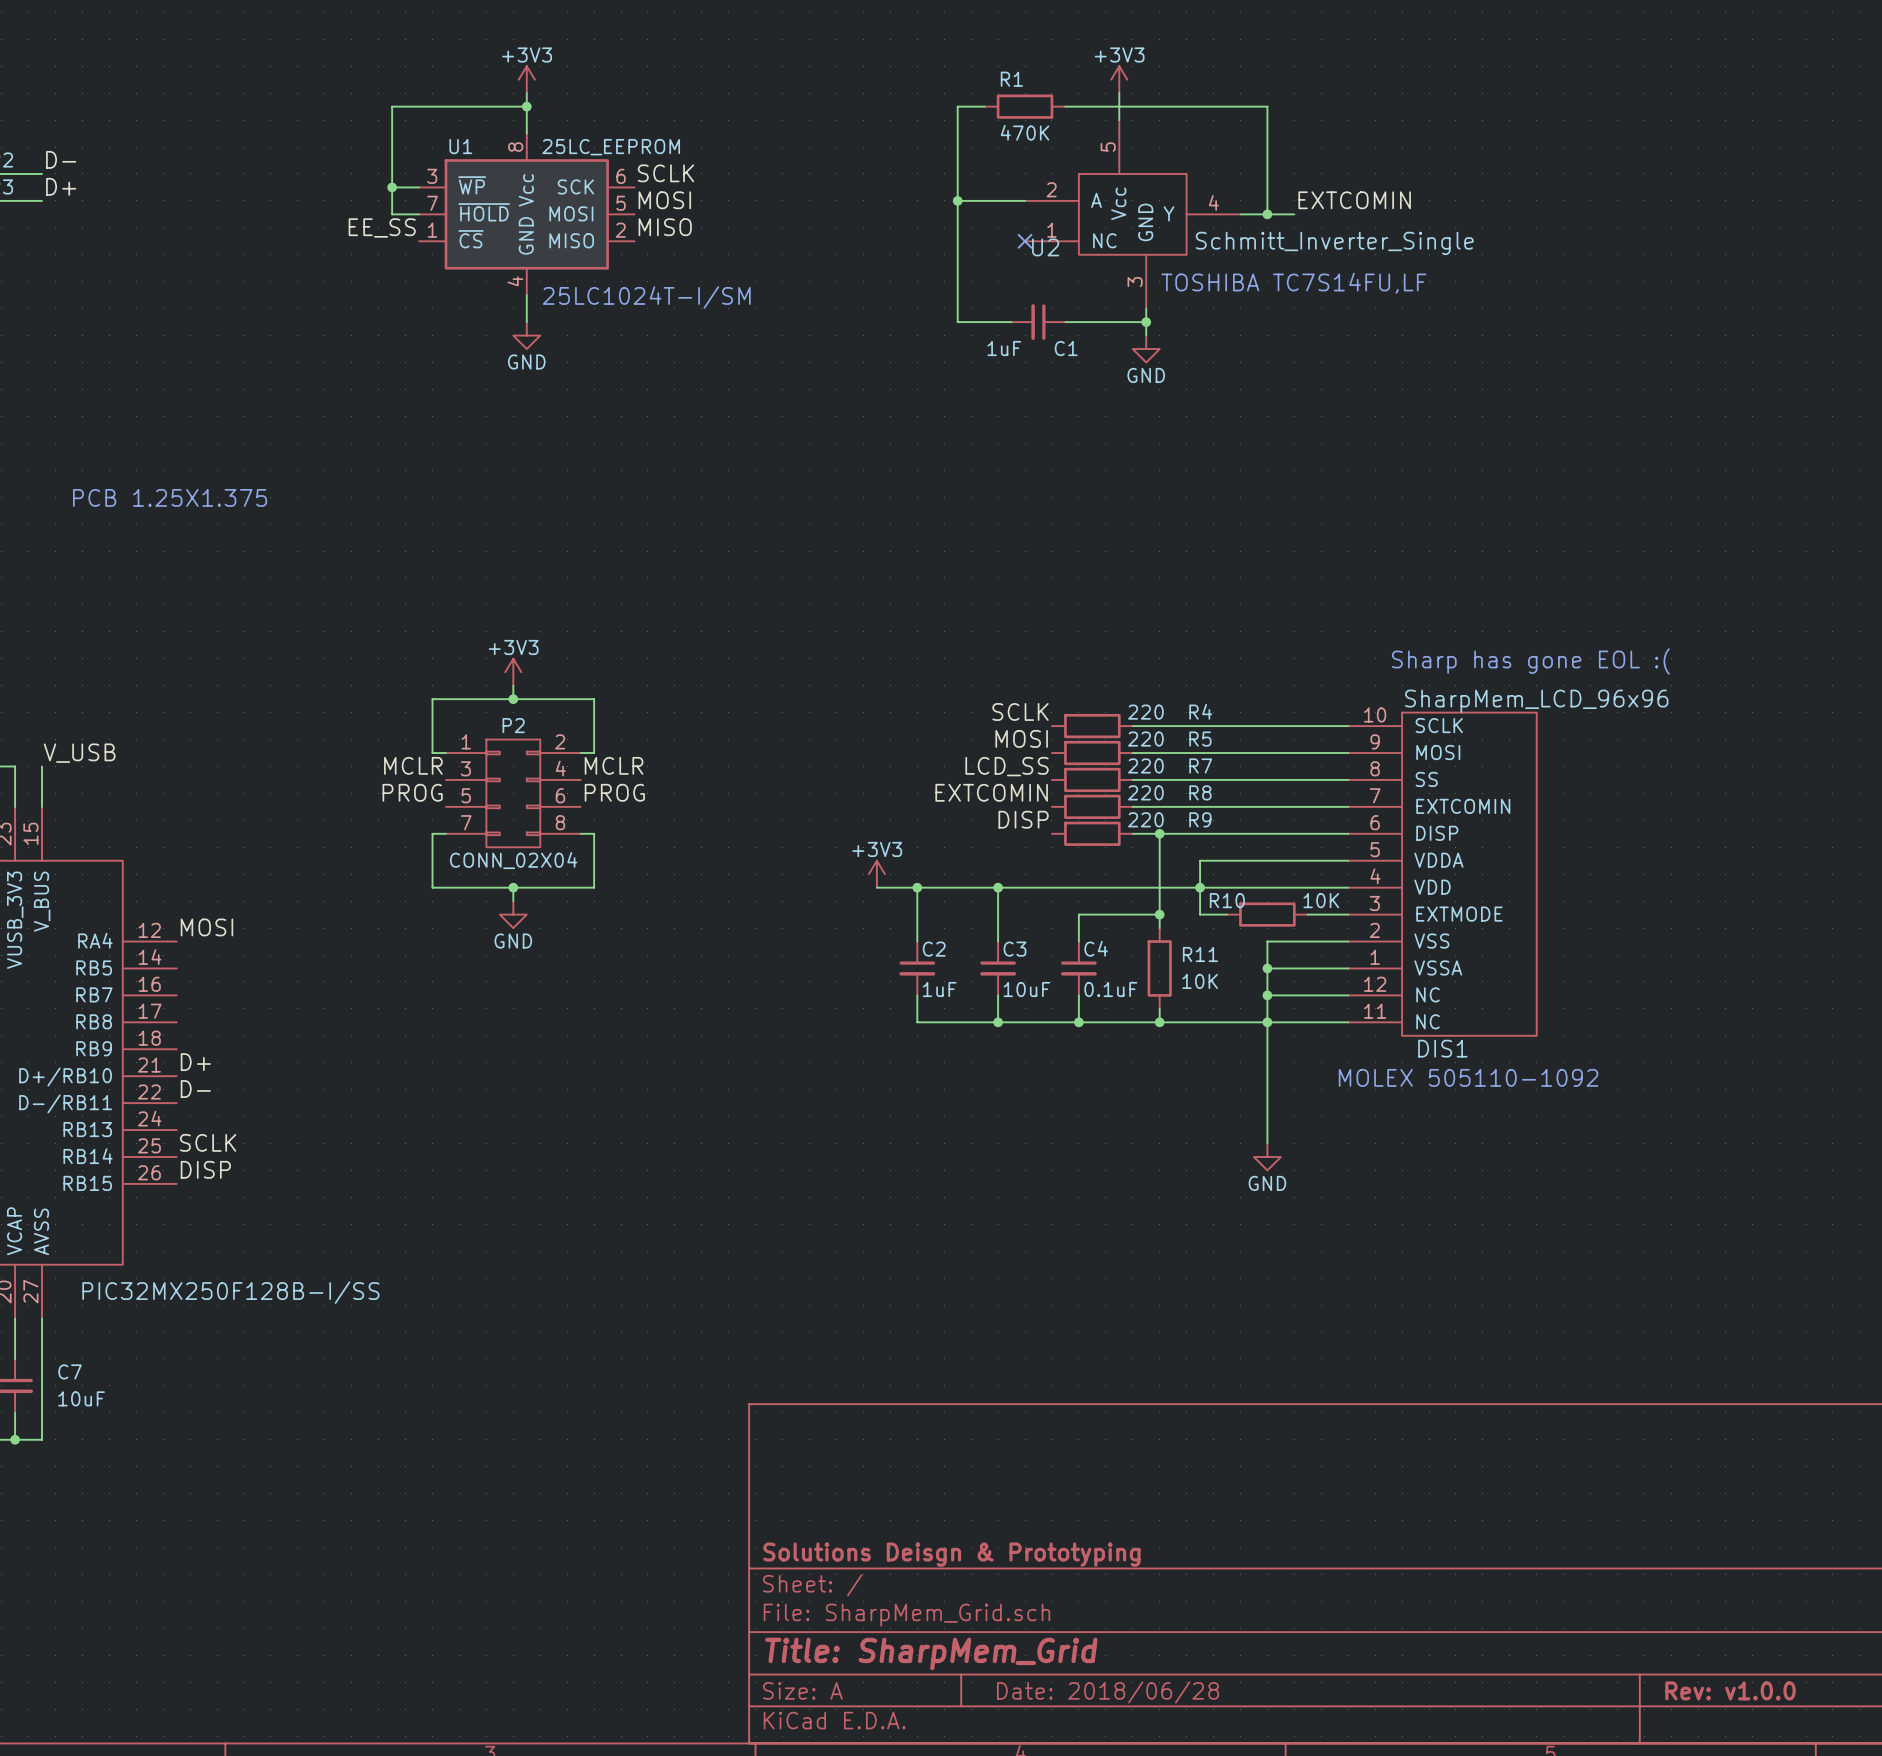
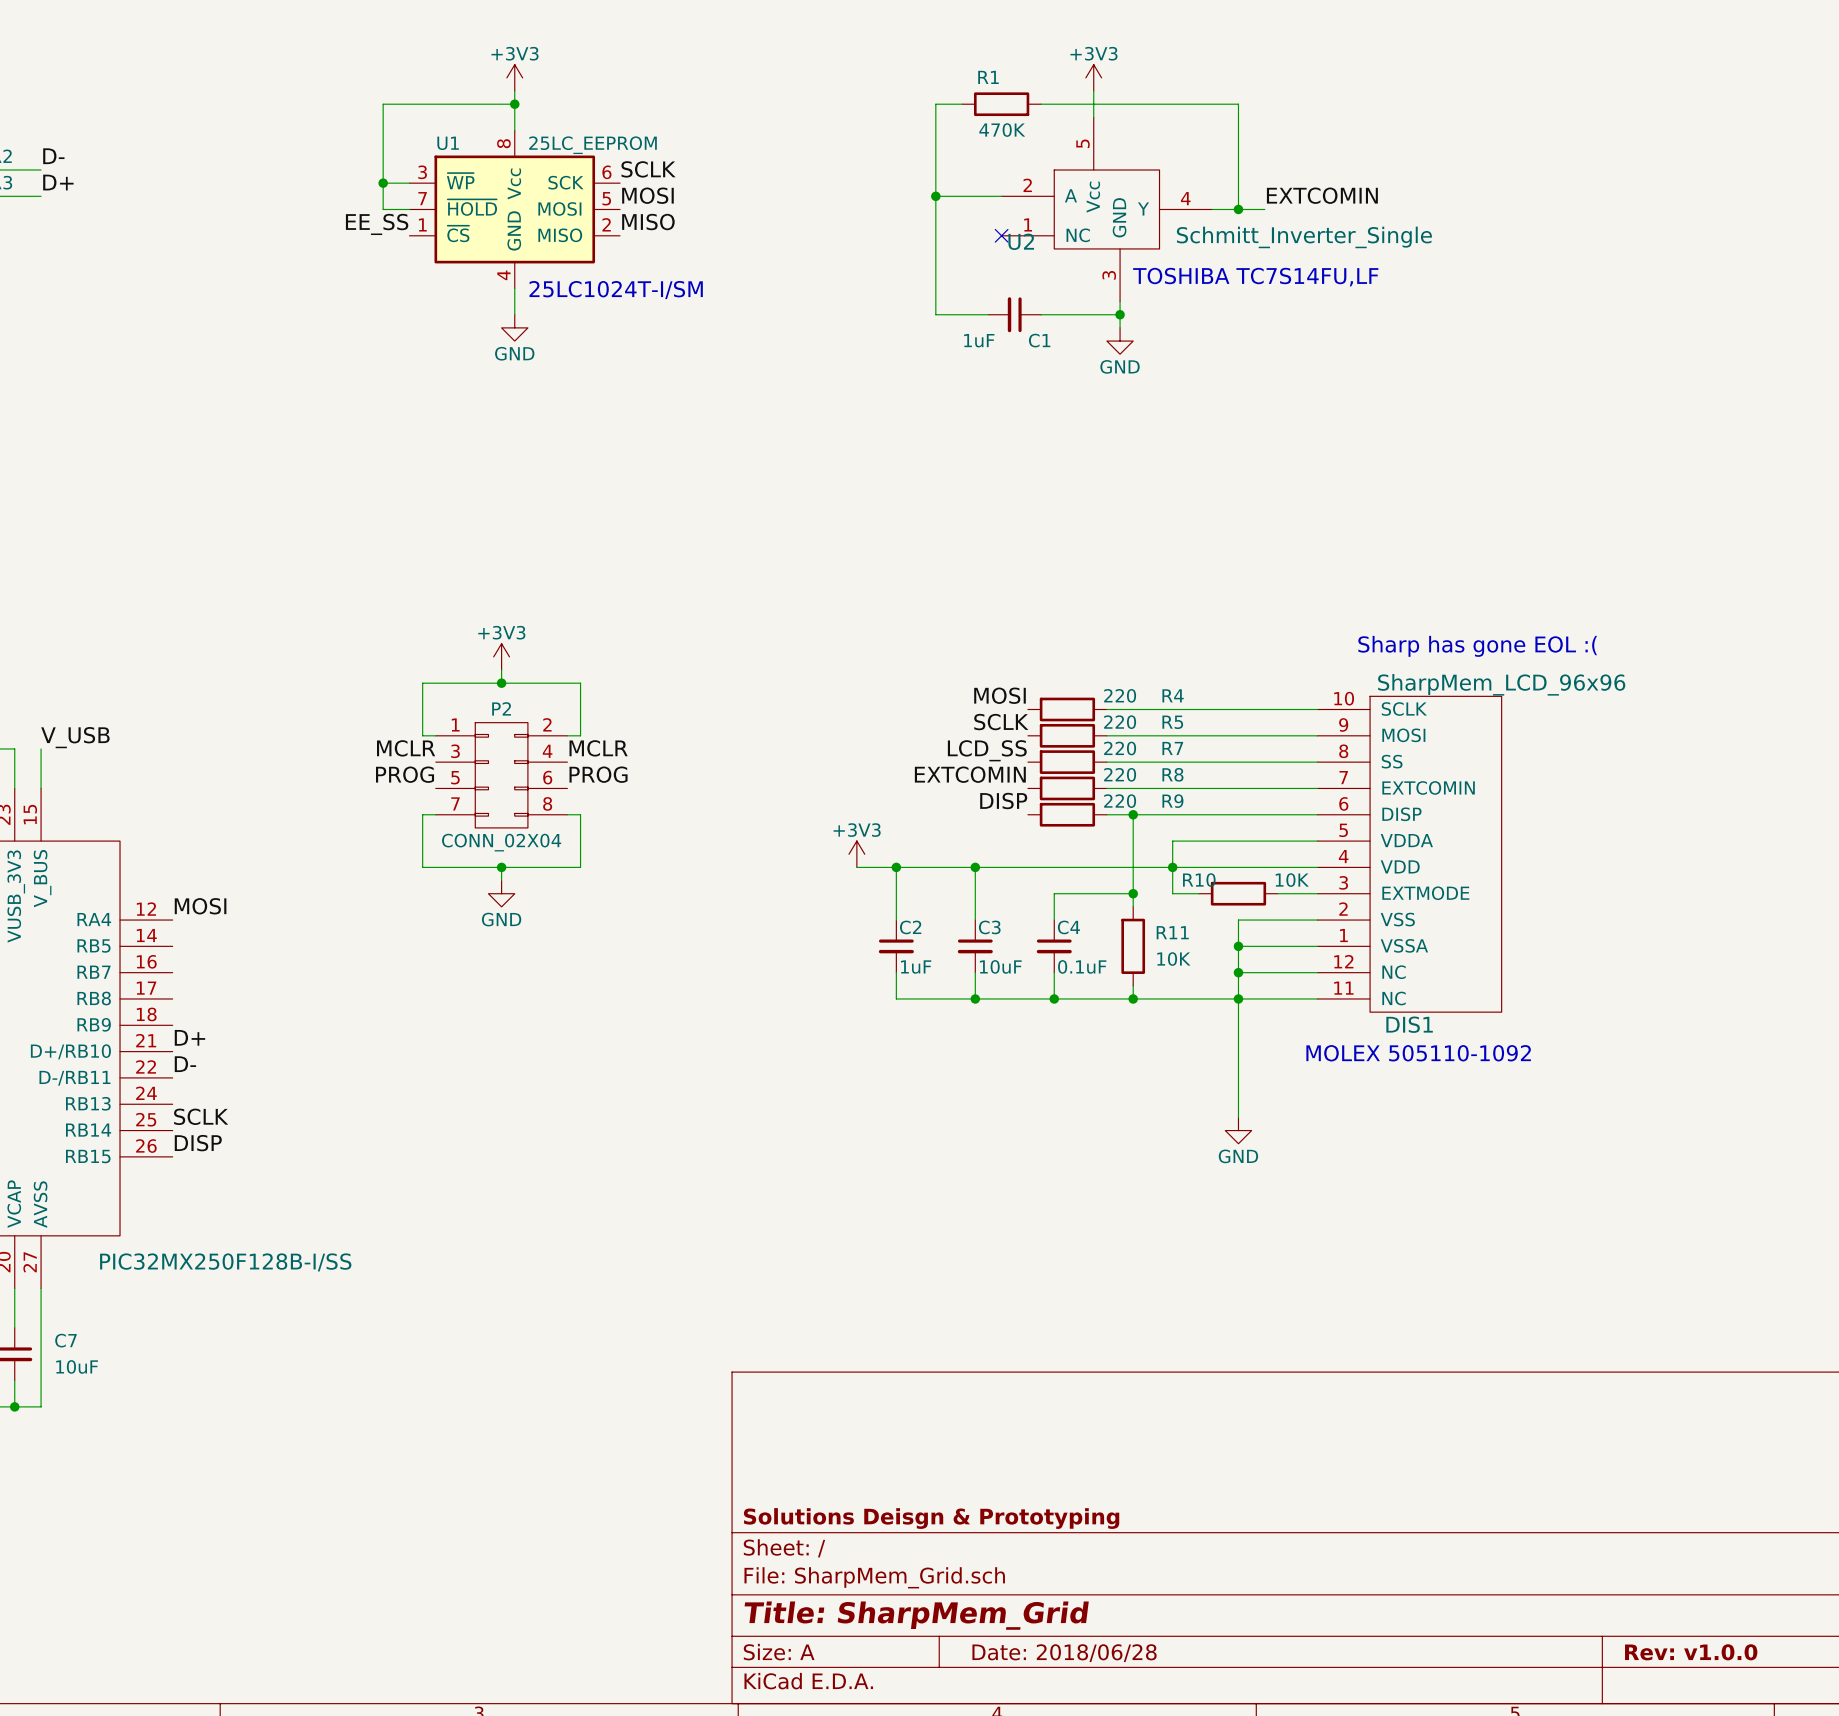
text: PCB 1.25X1.375 (170, 497) -> none
label: SCLK (1020, 711) -> MOSI (1000, 695)
label: MOSI (1021, 738) -> SCLK (1001, 722)

